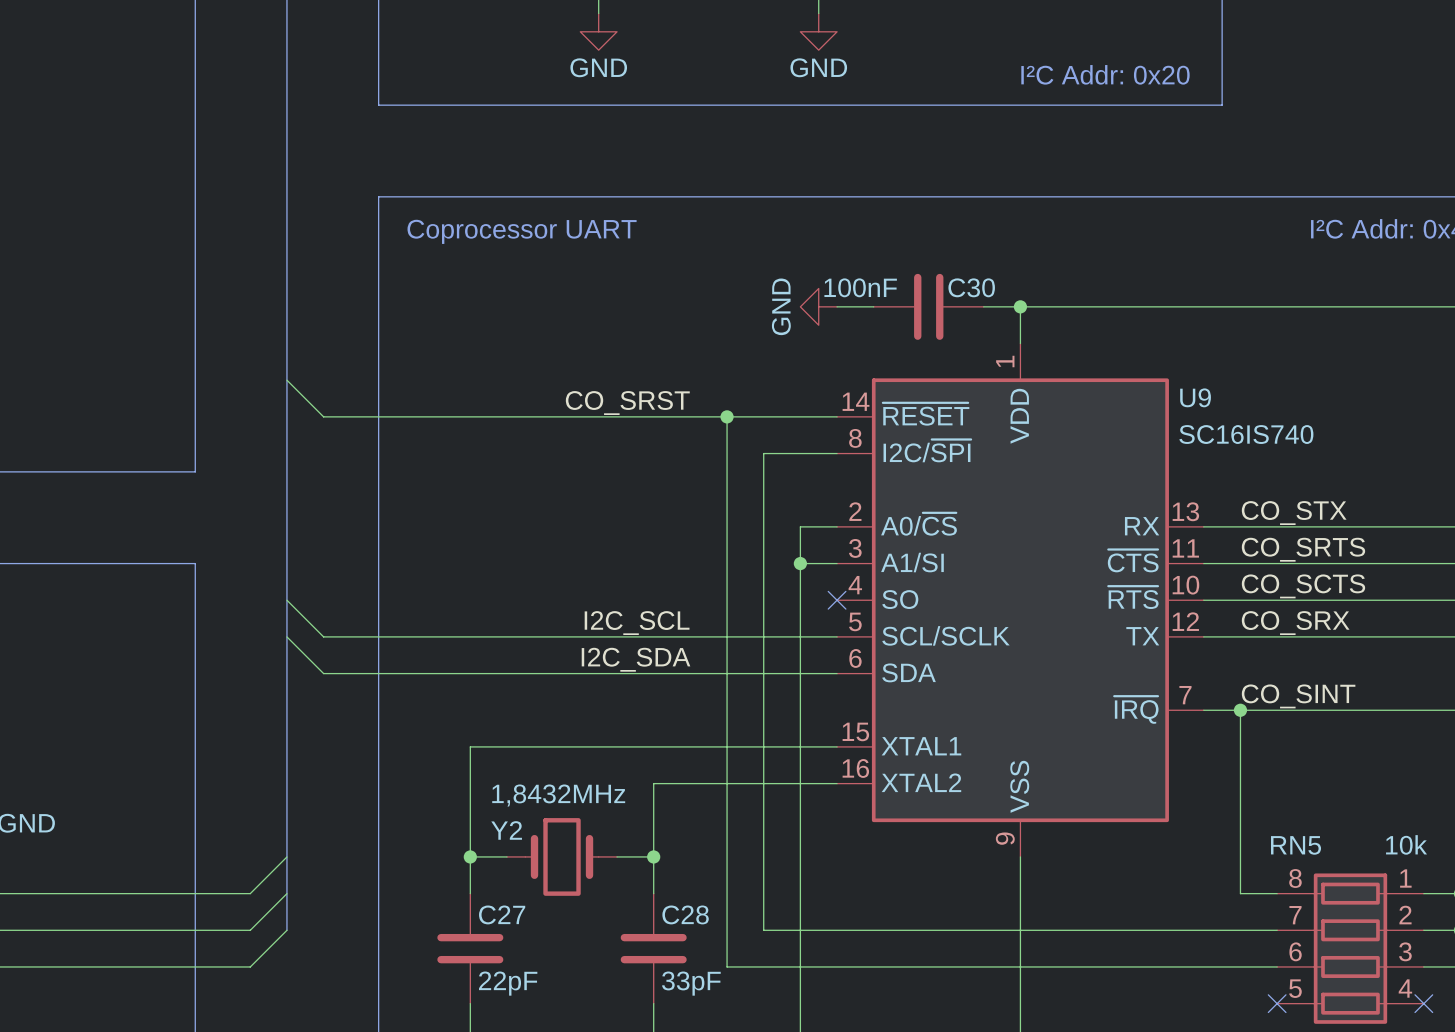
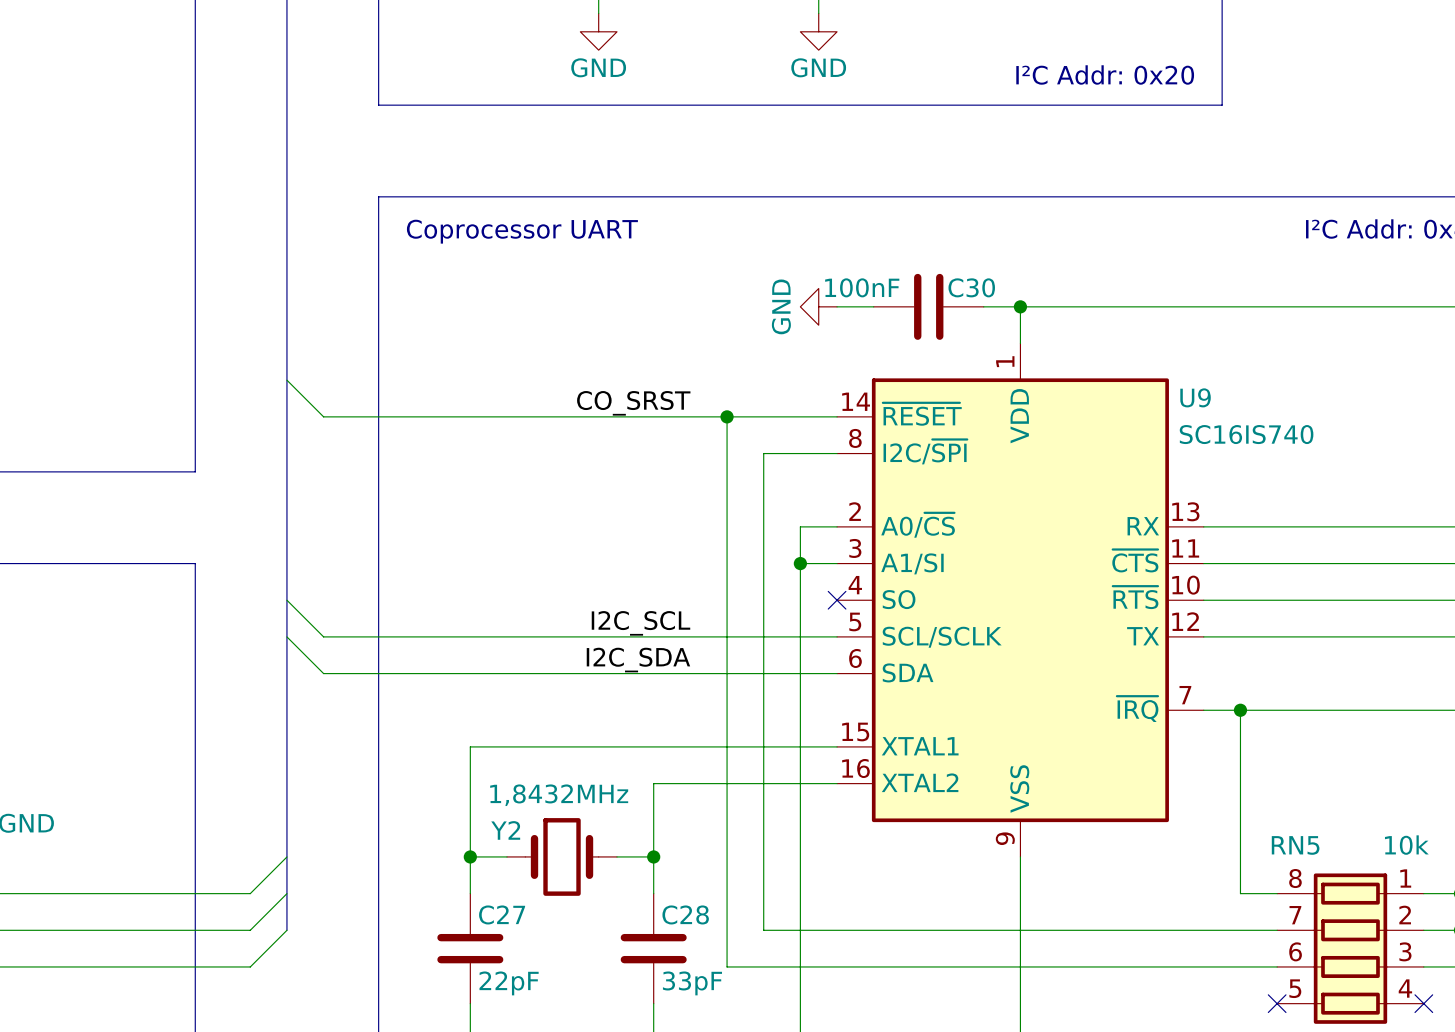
label: CO_STX (1294, 513) -> none
label: CO_SRTS (1303, 549) -> none
label: CO_SCTS (1303, 586) -> none
label: CO_SRX (1295, 623) -> none
label: CO_SINT (1298, 696) -> none

